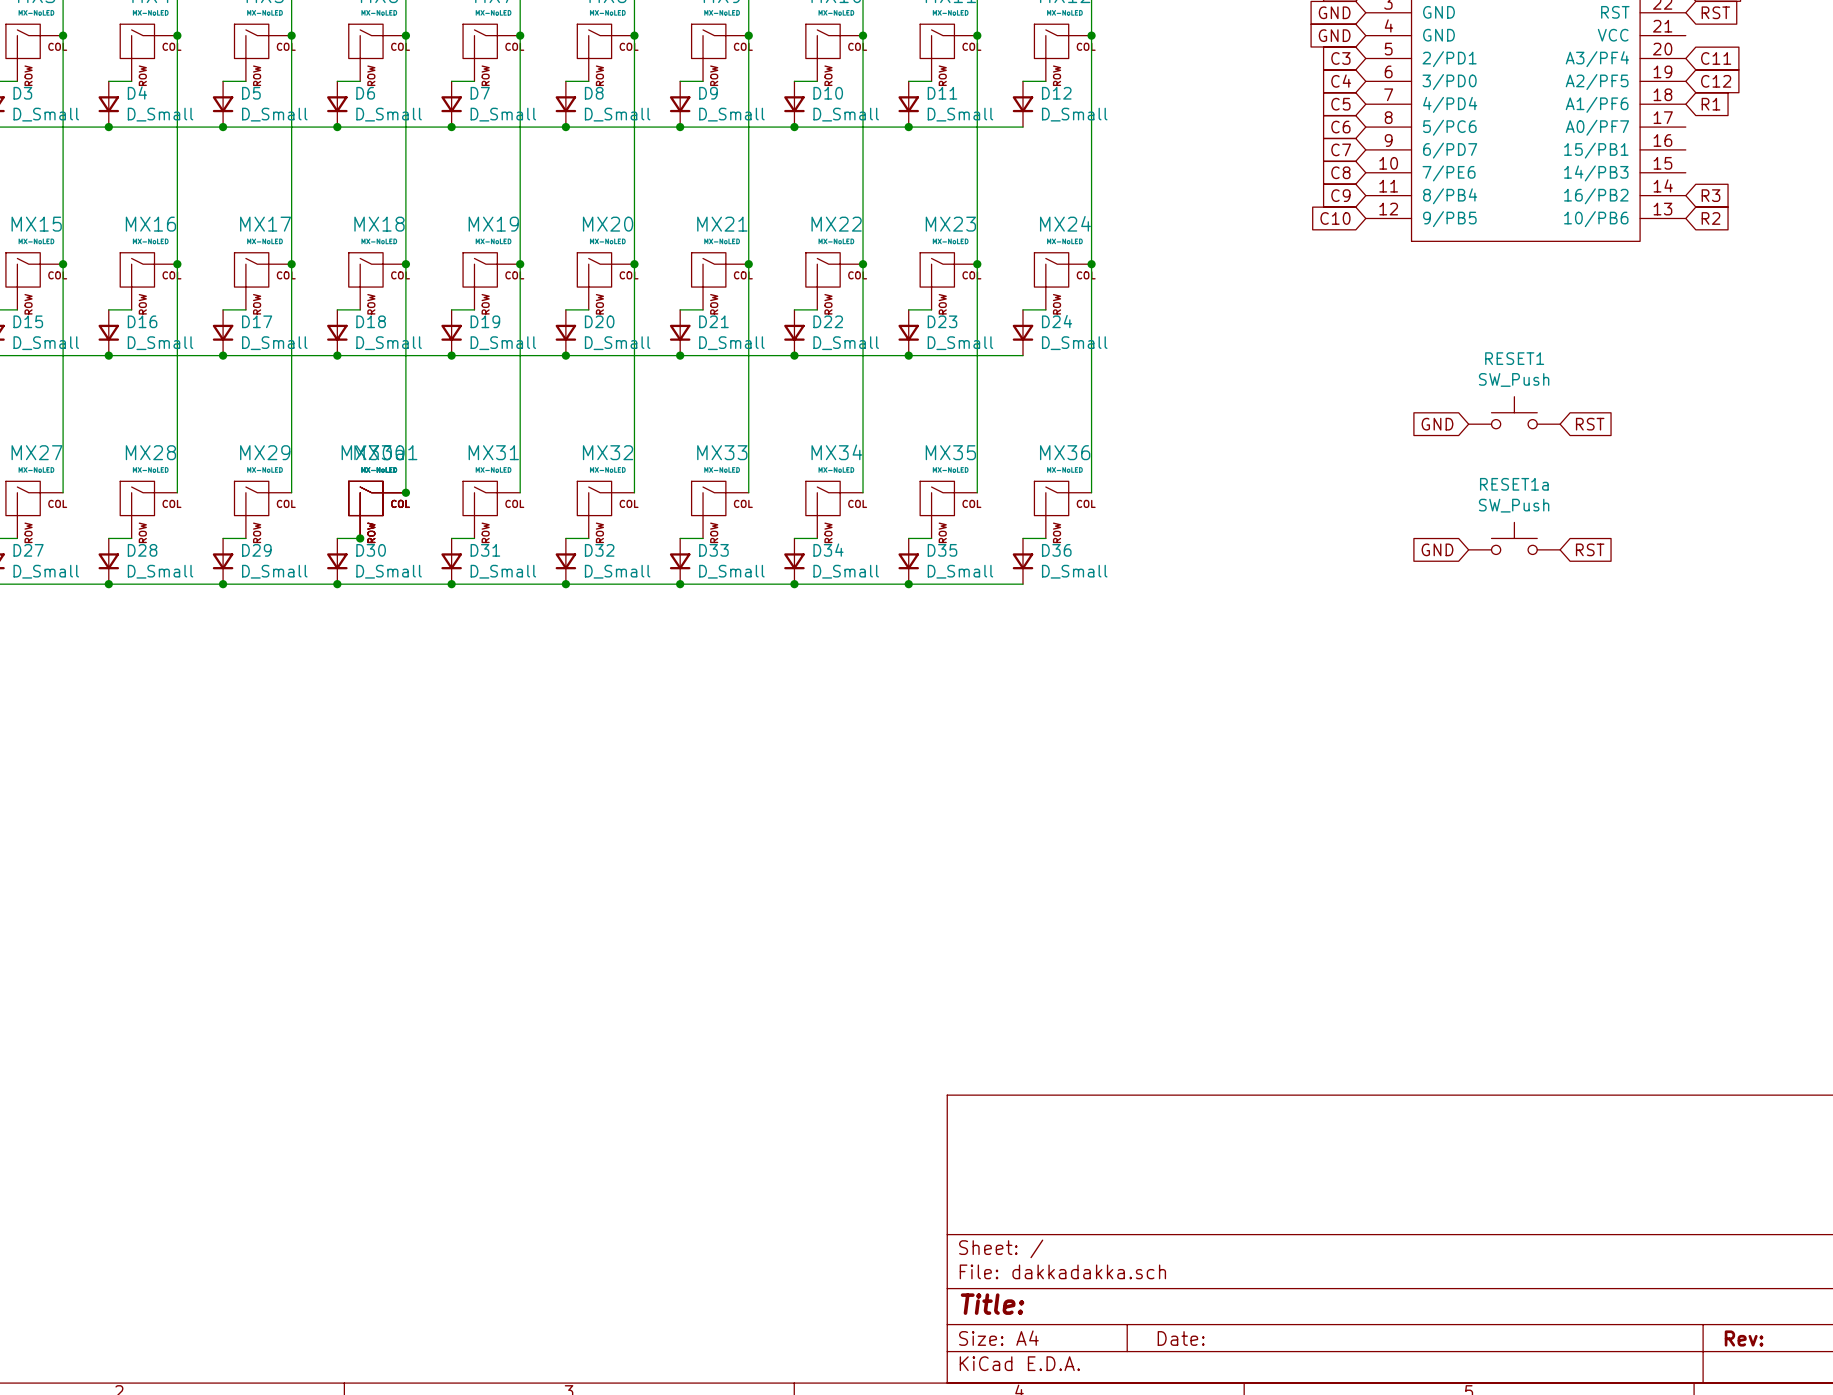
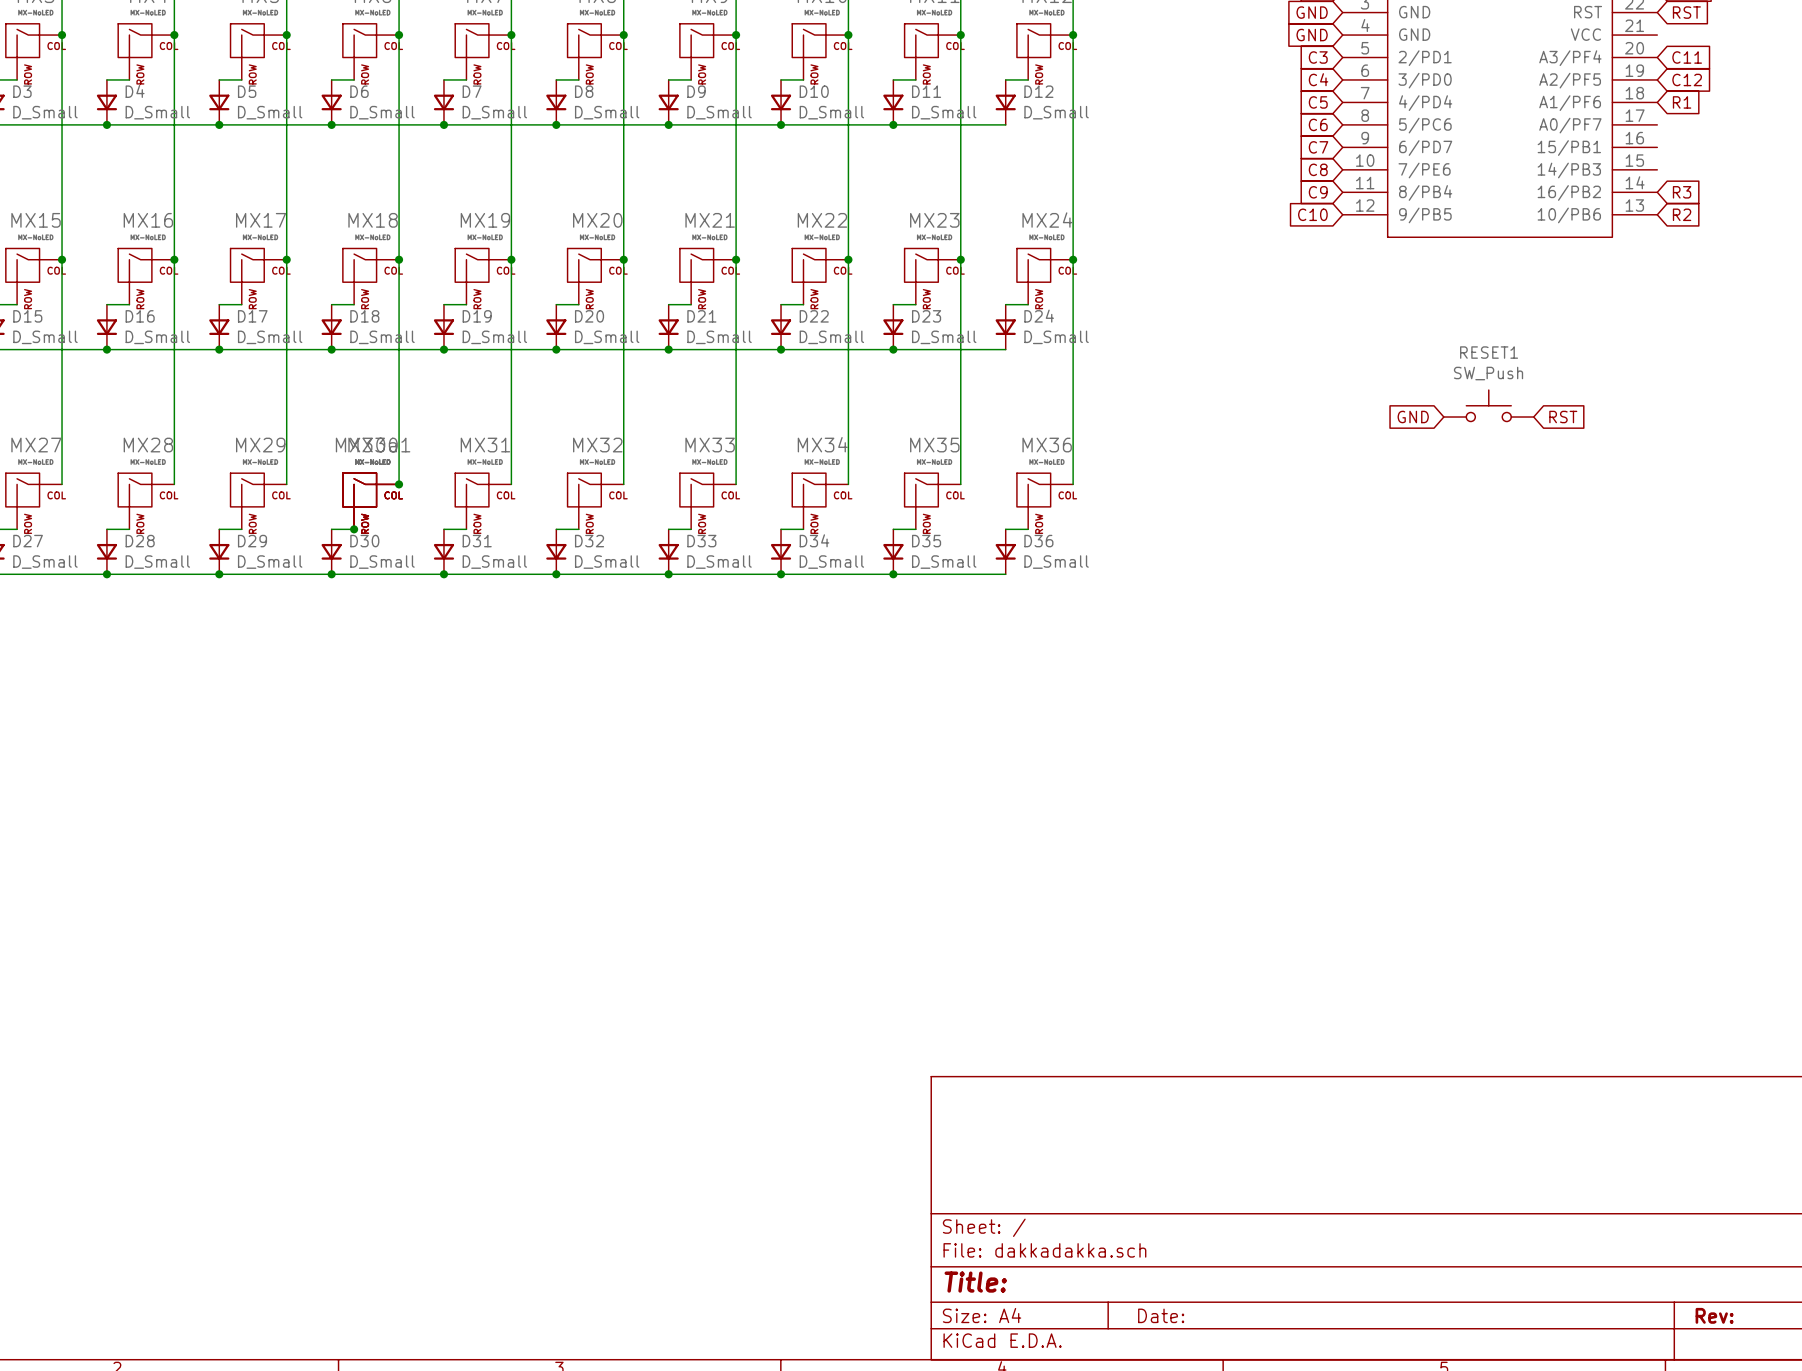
RESET1a: SW_Push (1514, 538) -> none
global label: GND (1437, 549) -> none
global label: RST (1590, 549) -> none

